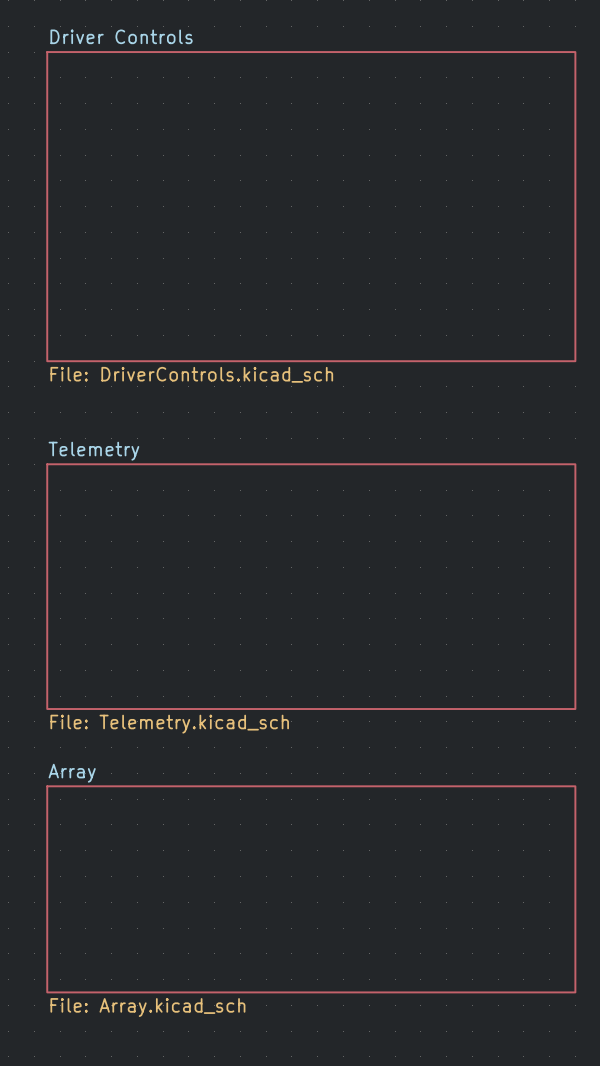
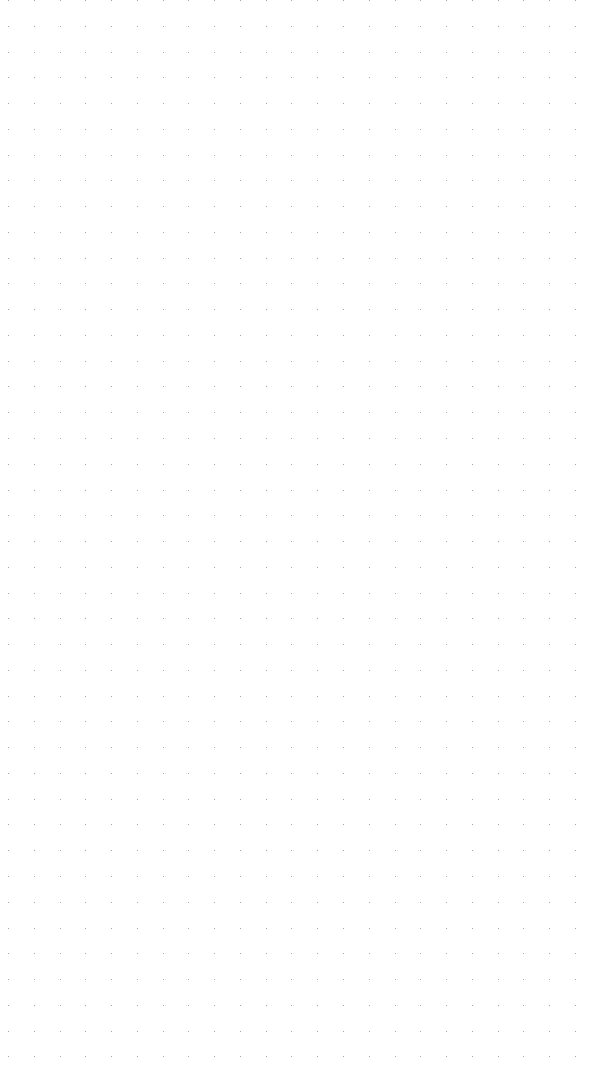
sheet Driver Controls: File: DriverControls.kicad_sch (311, 206) -> none
sheet Telemetry: File: Telemetry.kicad_sch (311, 586) -> none
sheet Array: File: Array.kicad_sch (311, 889) -> none

